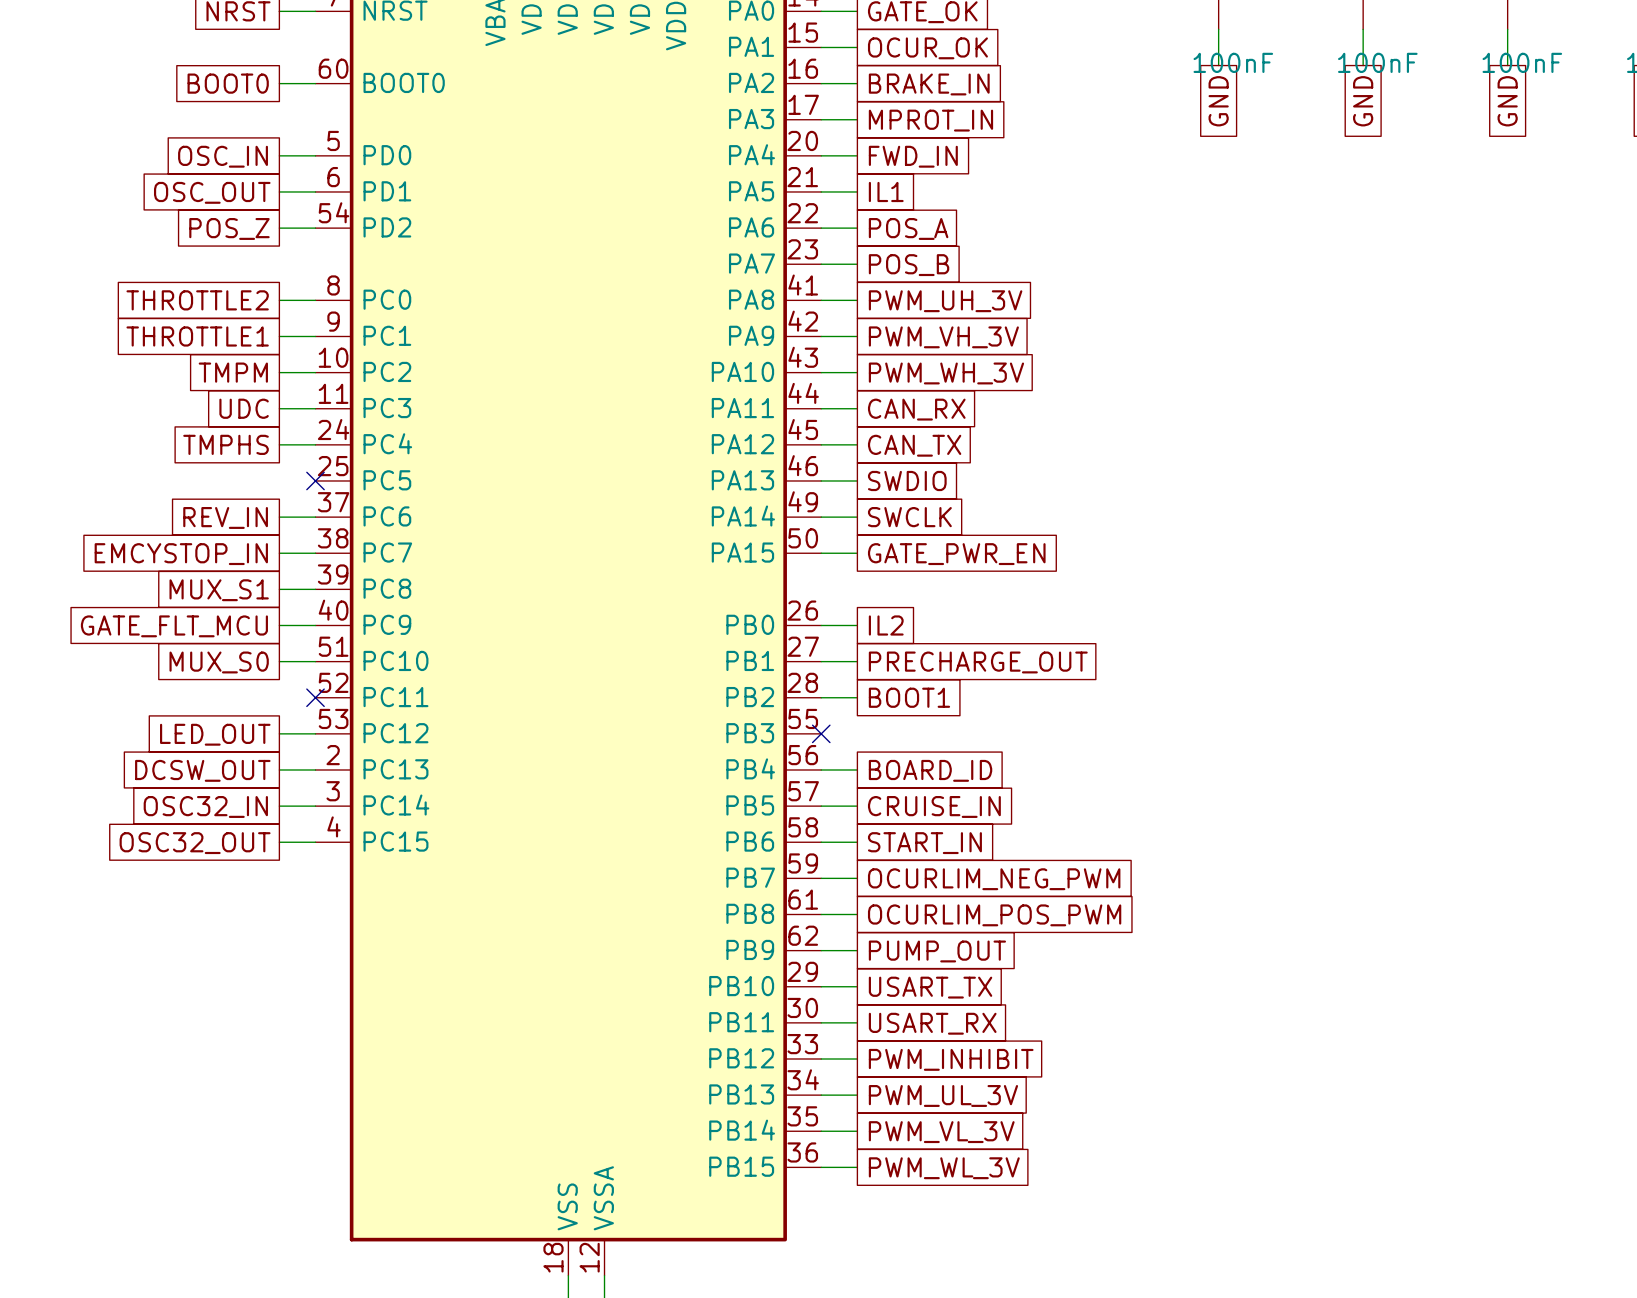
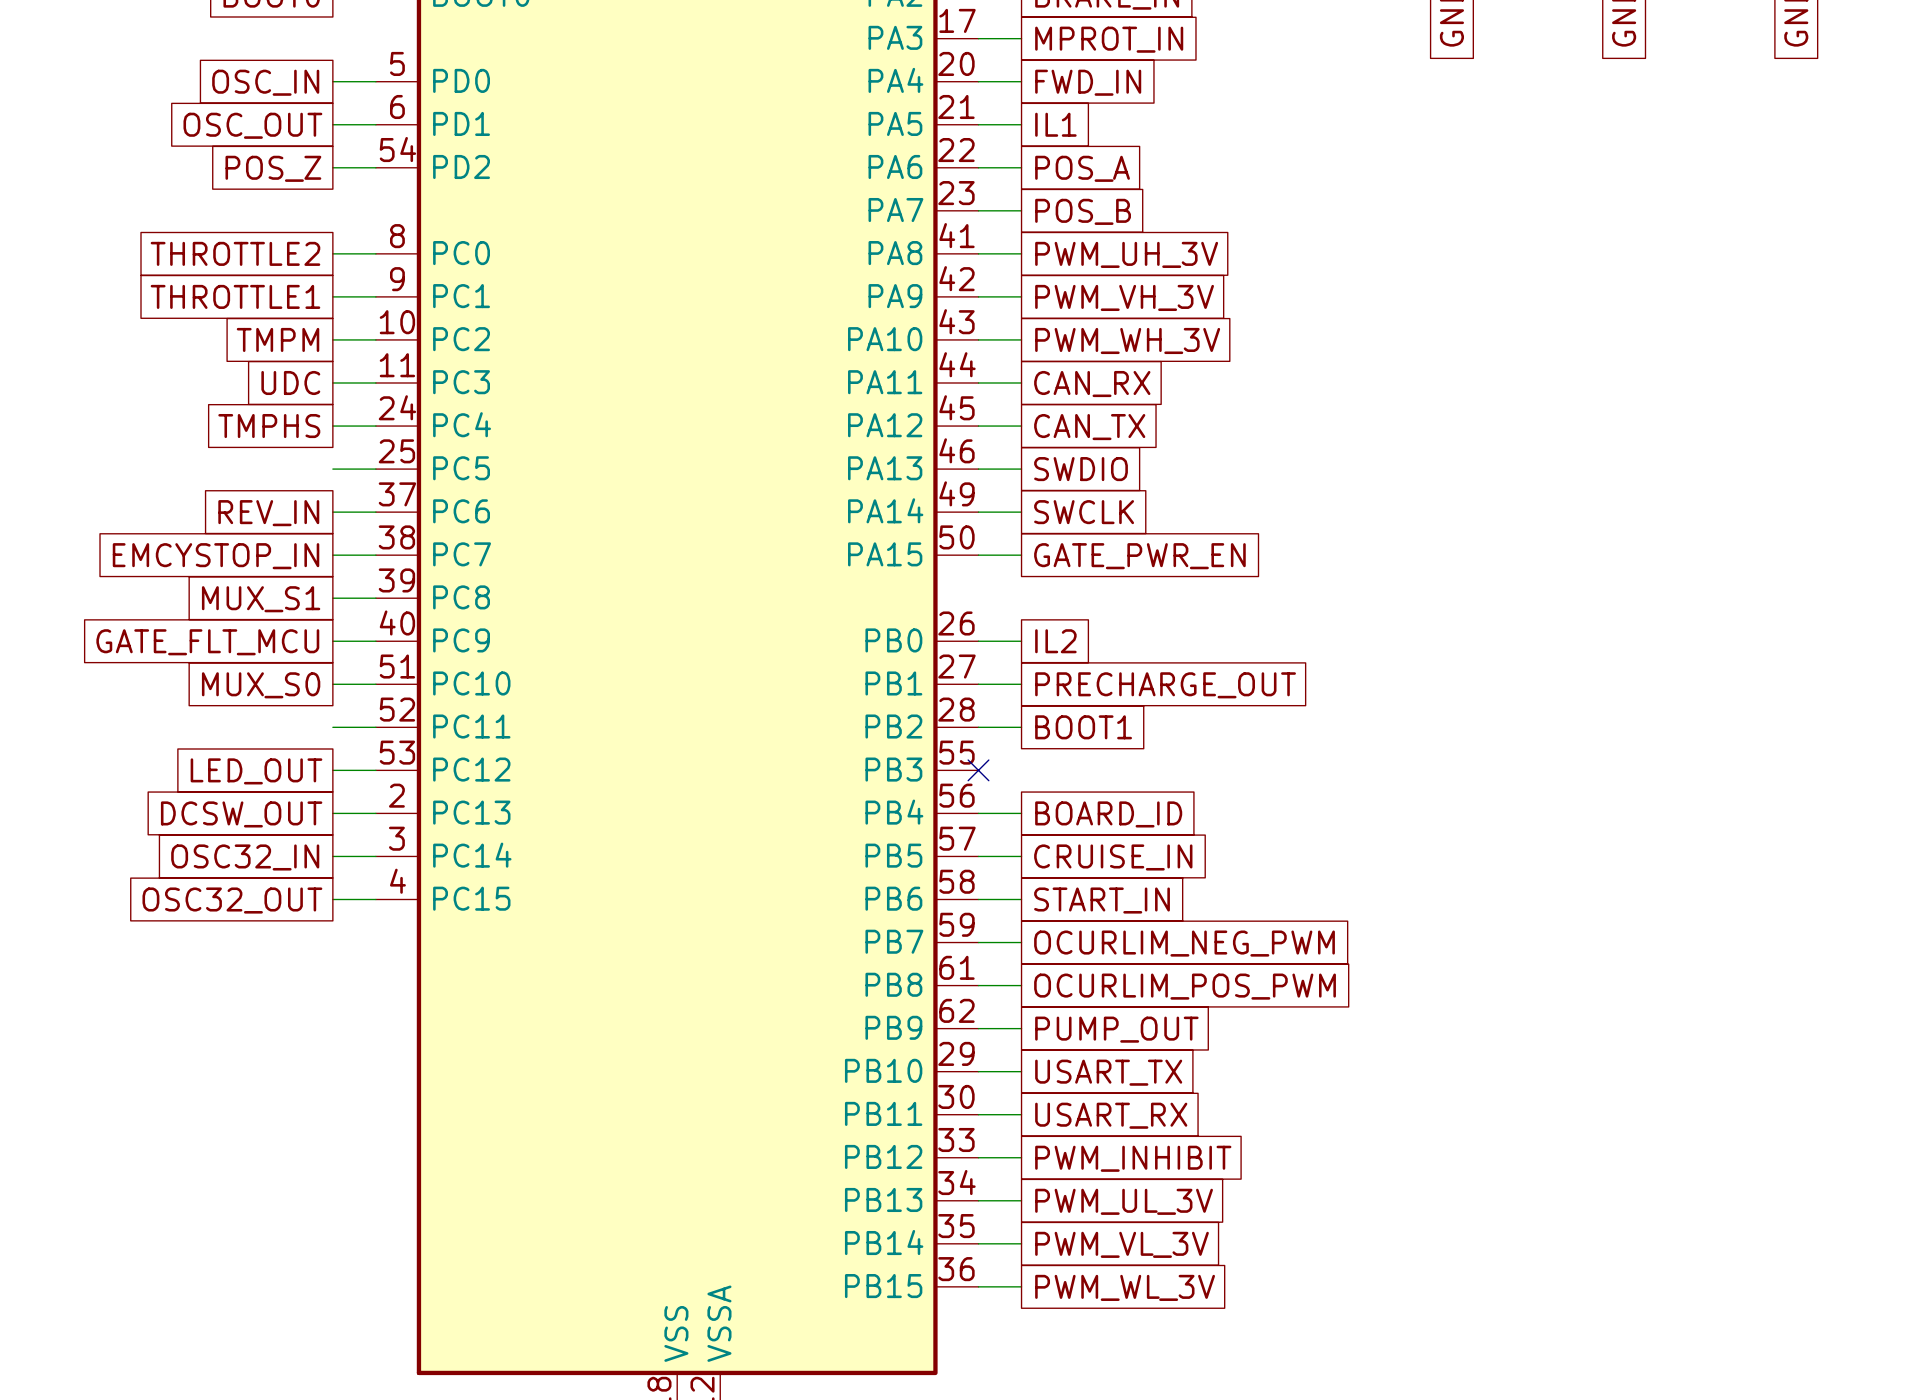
wire: none -> (332, 469) (375, 469)
no-connect mark: (315, 480) -> none
wire: none -> (332, 727) (375, 727)
no-connect mark: (315, 697) -> none

